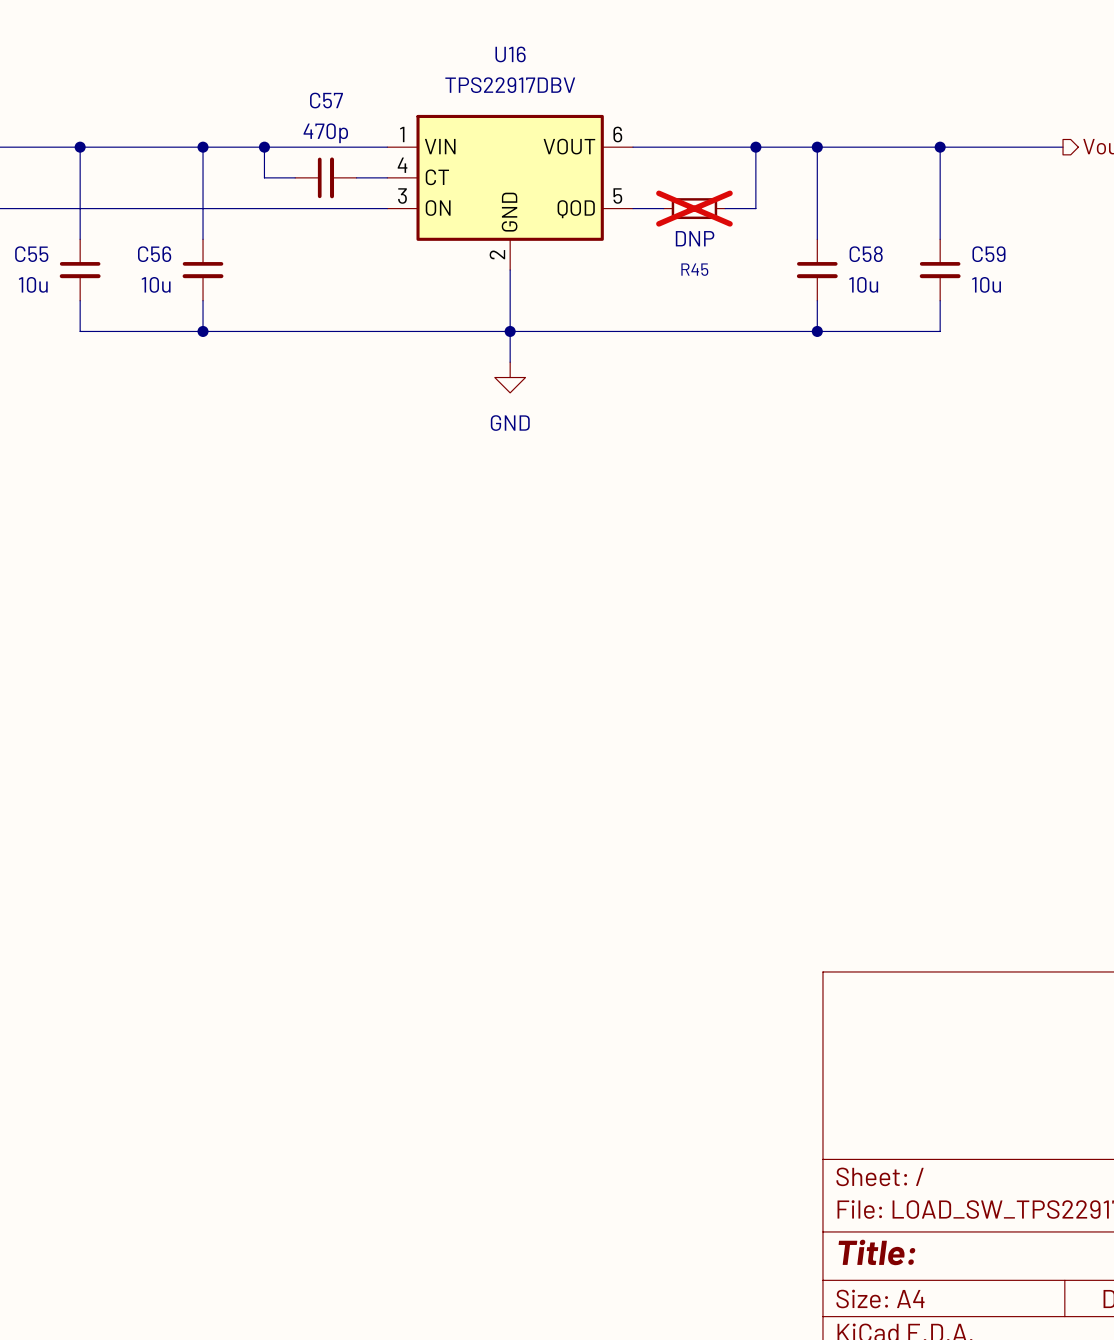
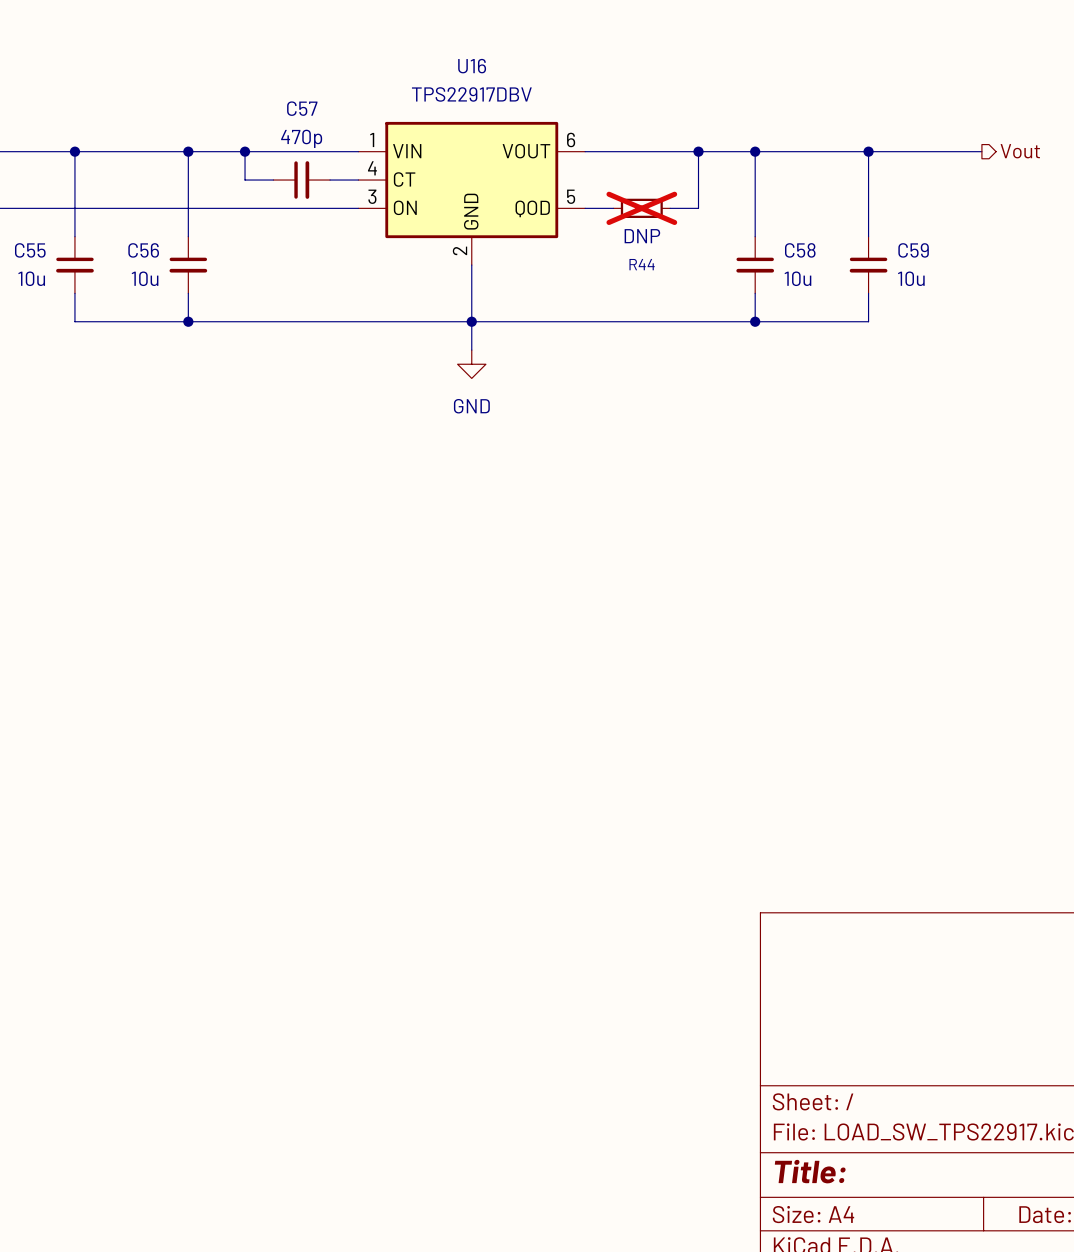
R45 name: R45 (694, 269) -> R44 (642, 264)

